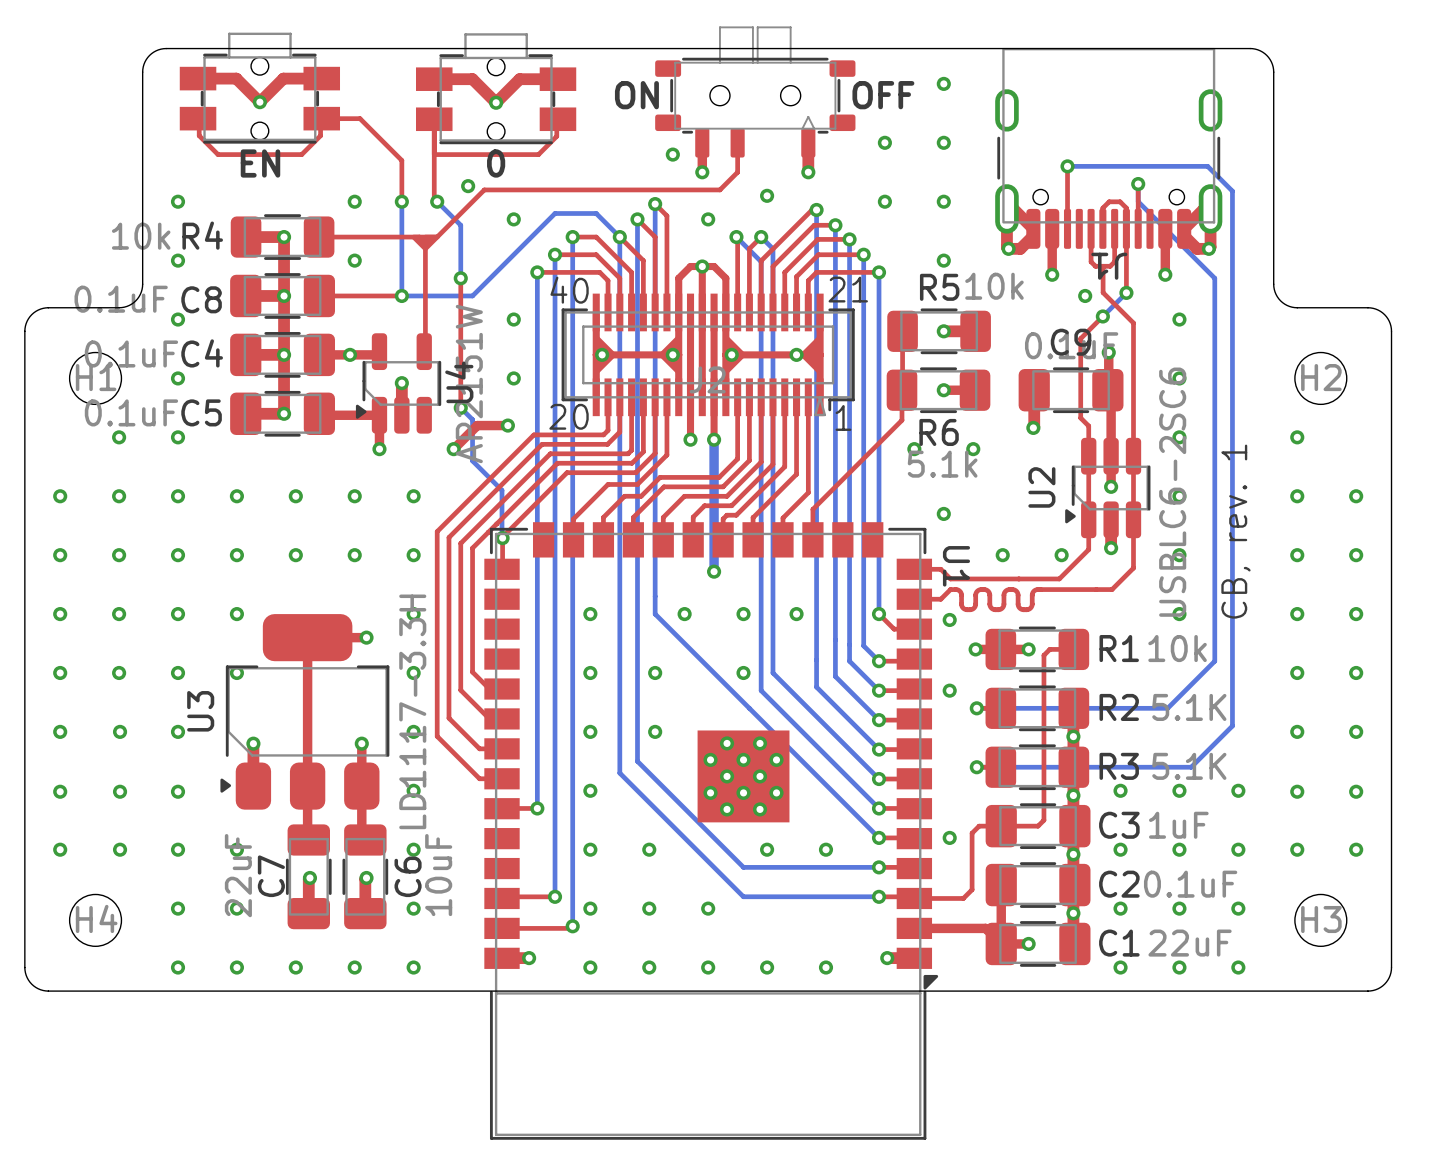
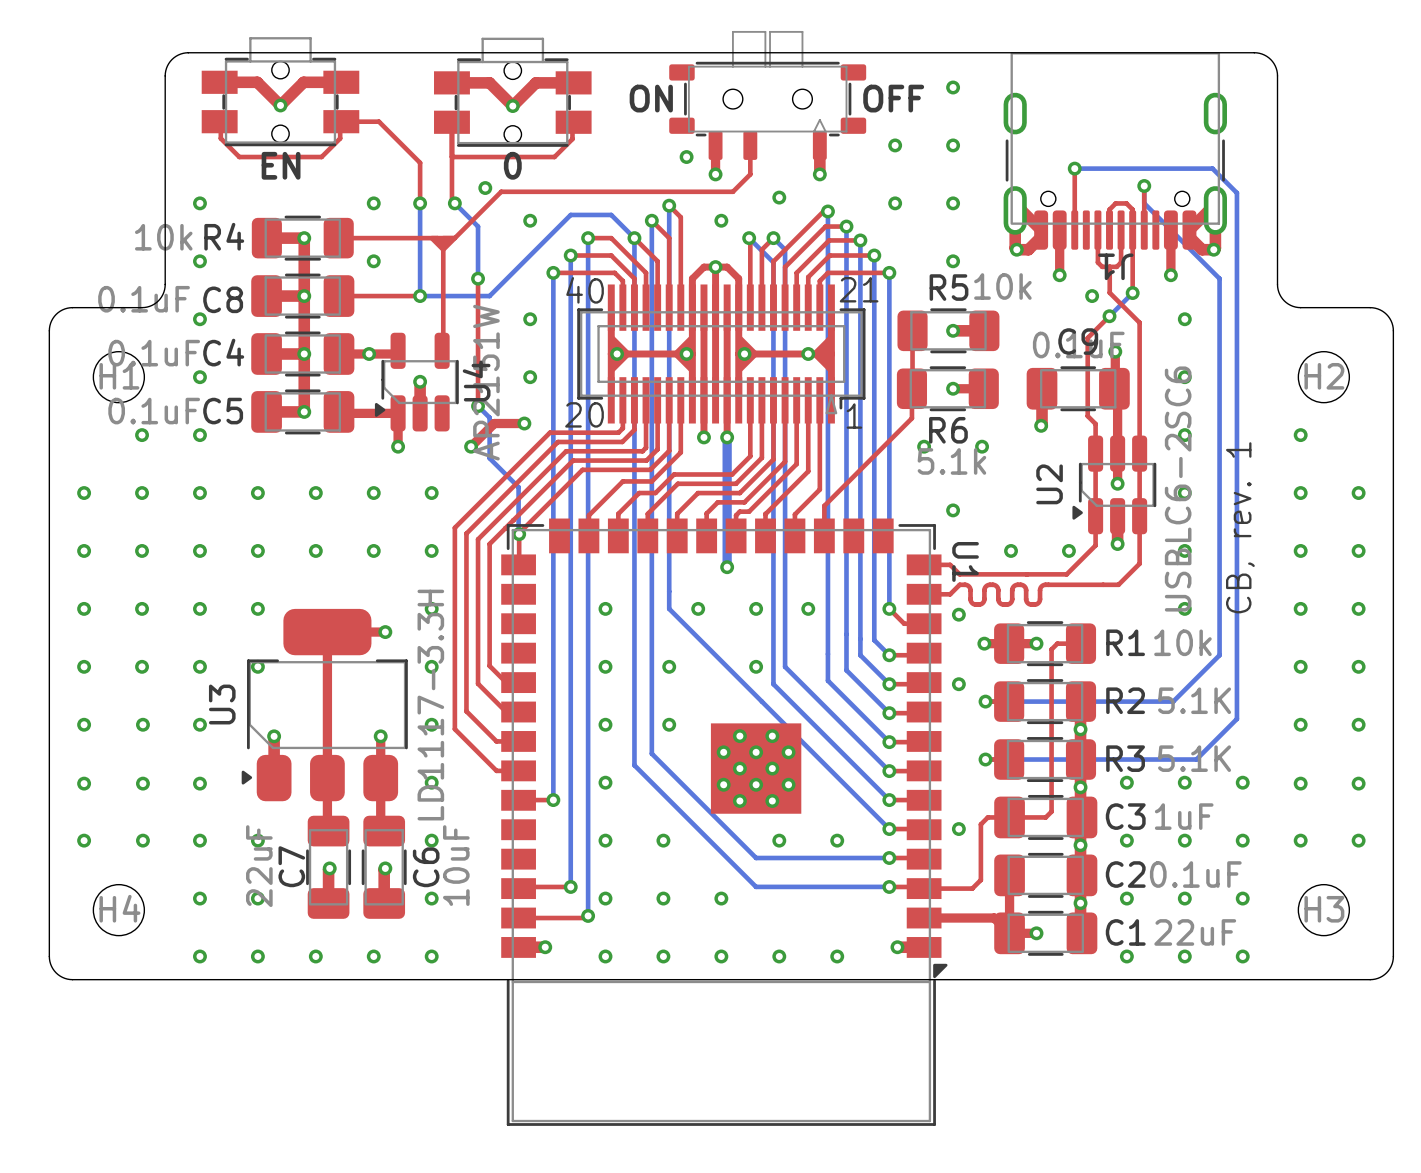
part: (708, 354) -> none
part: none -> (721, 353)

